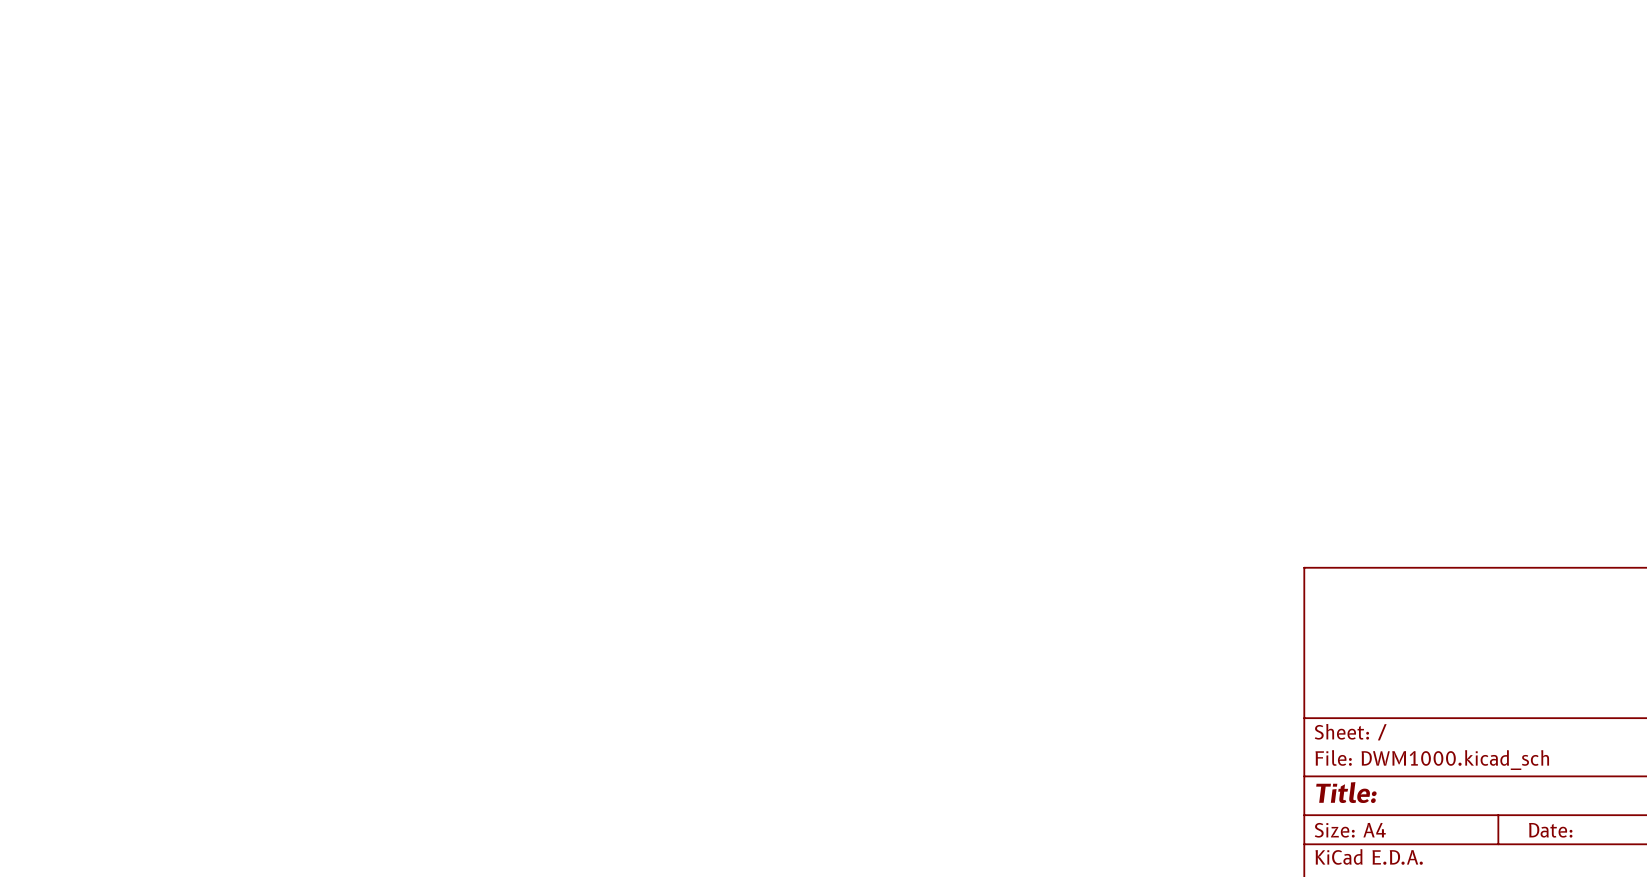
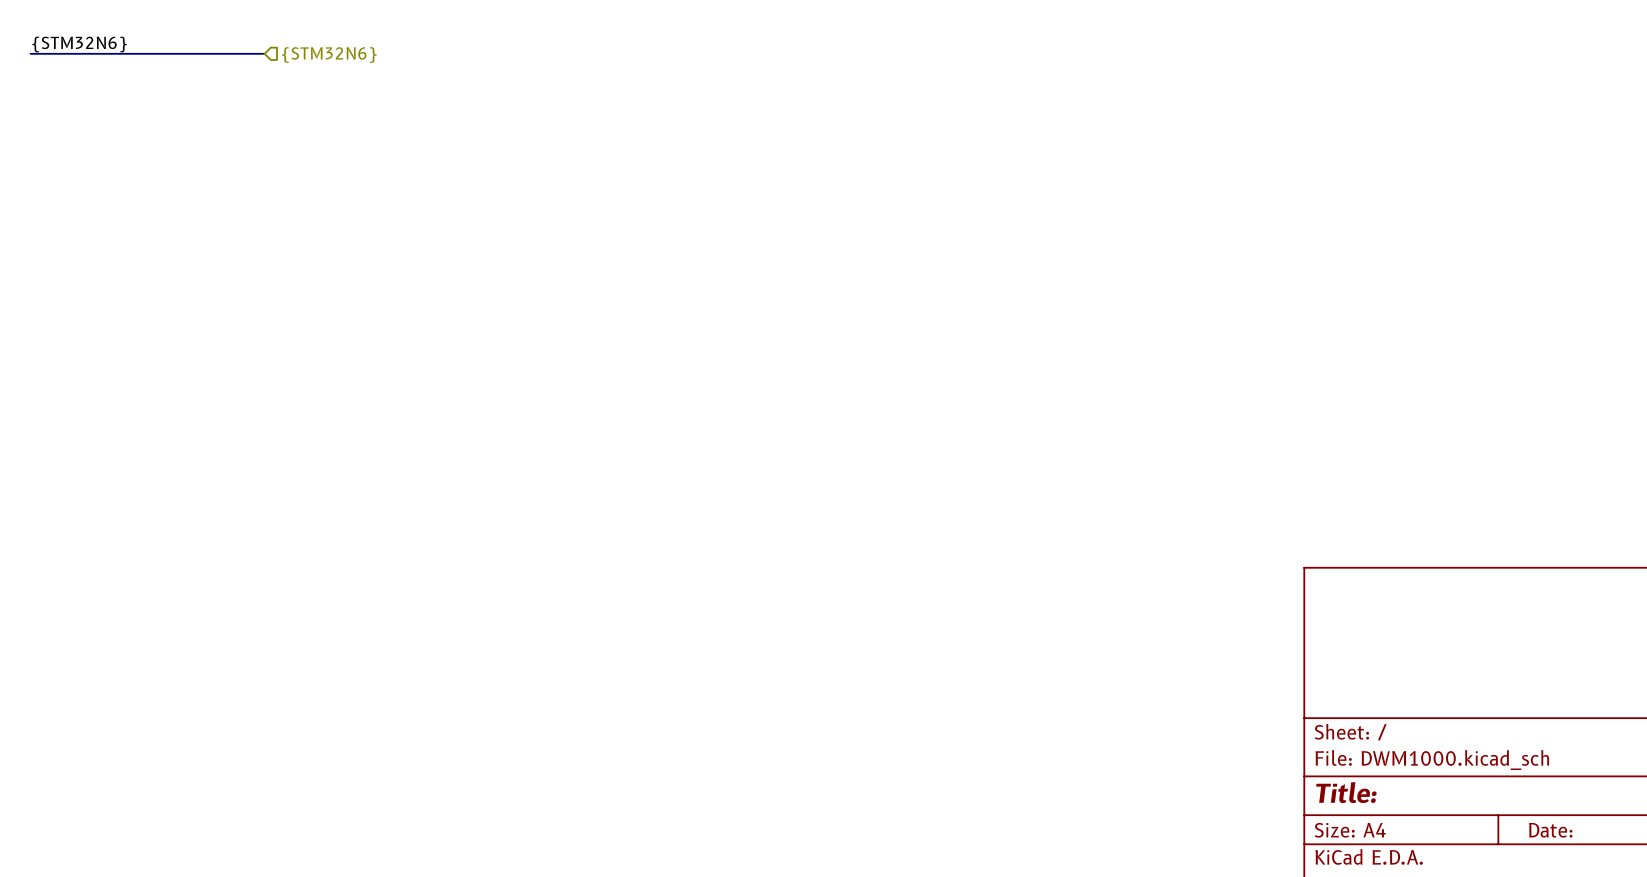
label: none -> {STM32N6} (79, 44)
bus: none -> (30, 53) (264, 53)
hierarchical label: none -> {STM32N6} (329, 55)

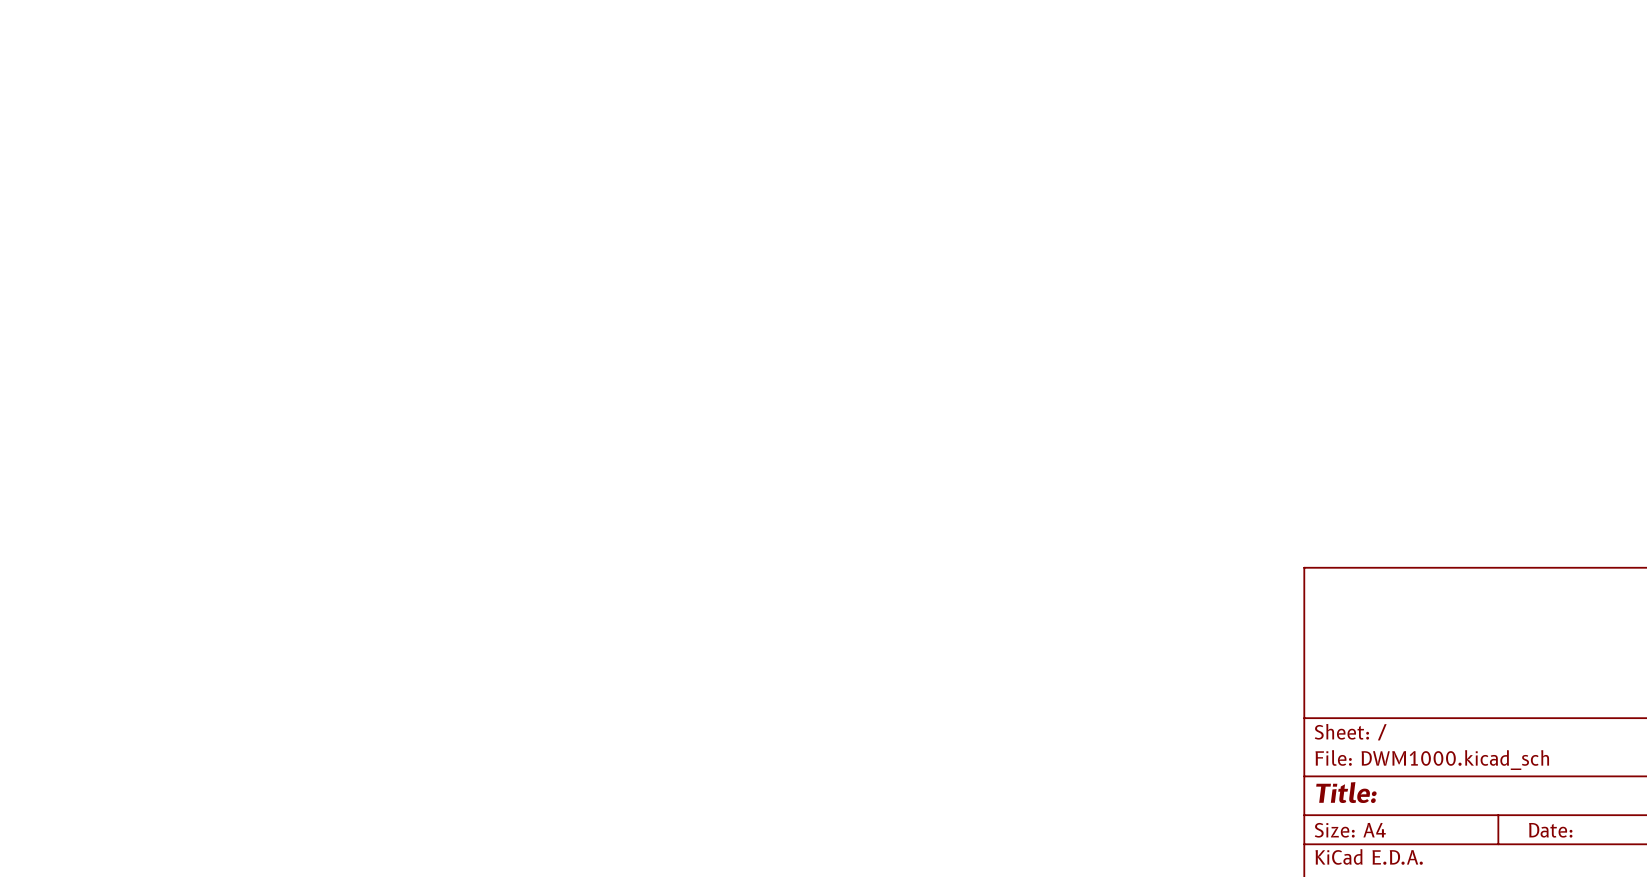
label: {STM32N6} (79, 44) -> none
bus: (30, 53) (264, 53) -> none
hierarchical label: {STM32N6} (329, 55) -> none

